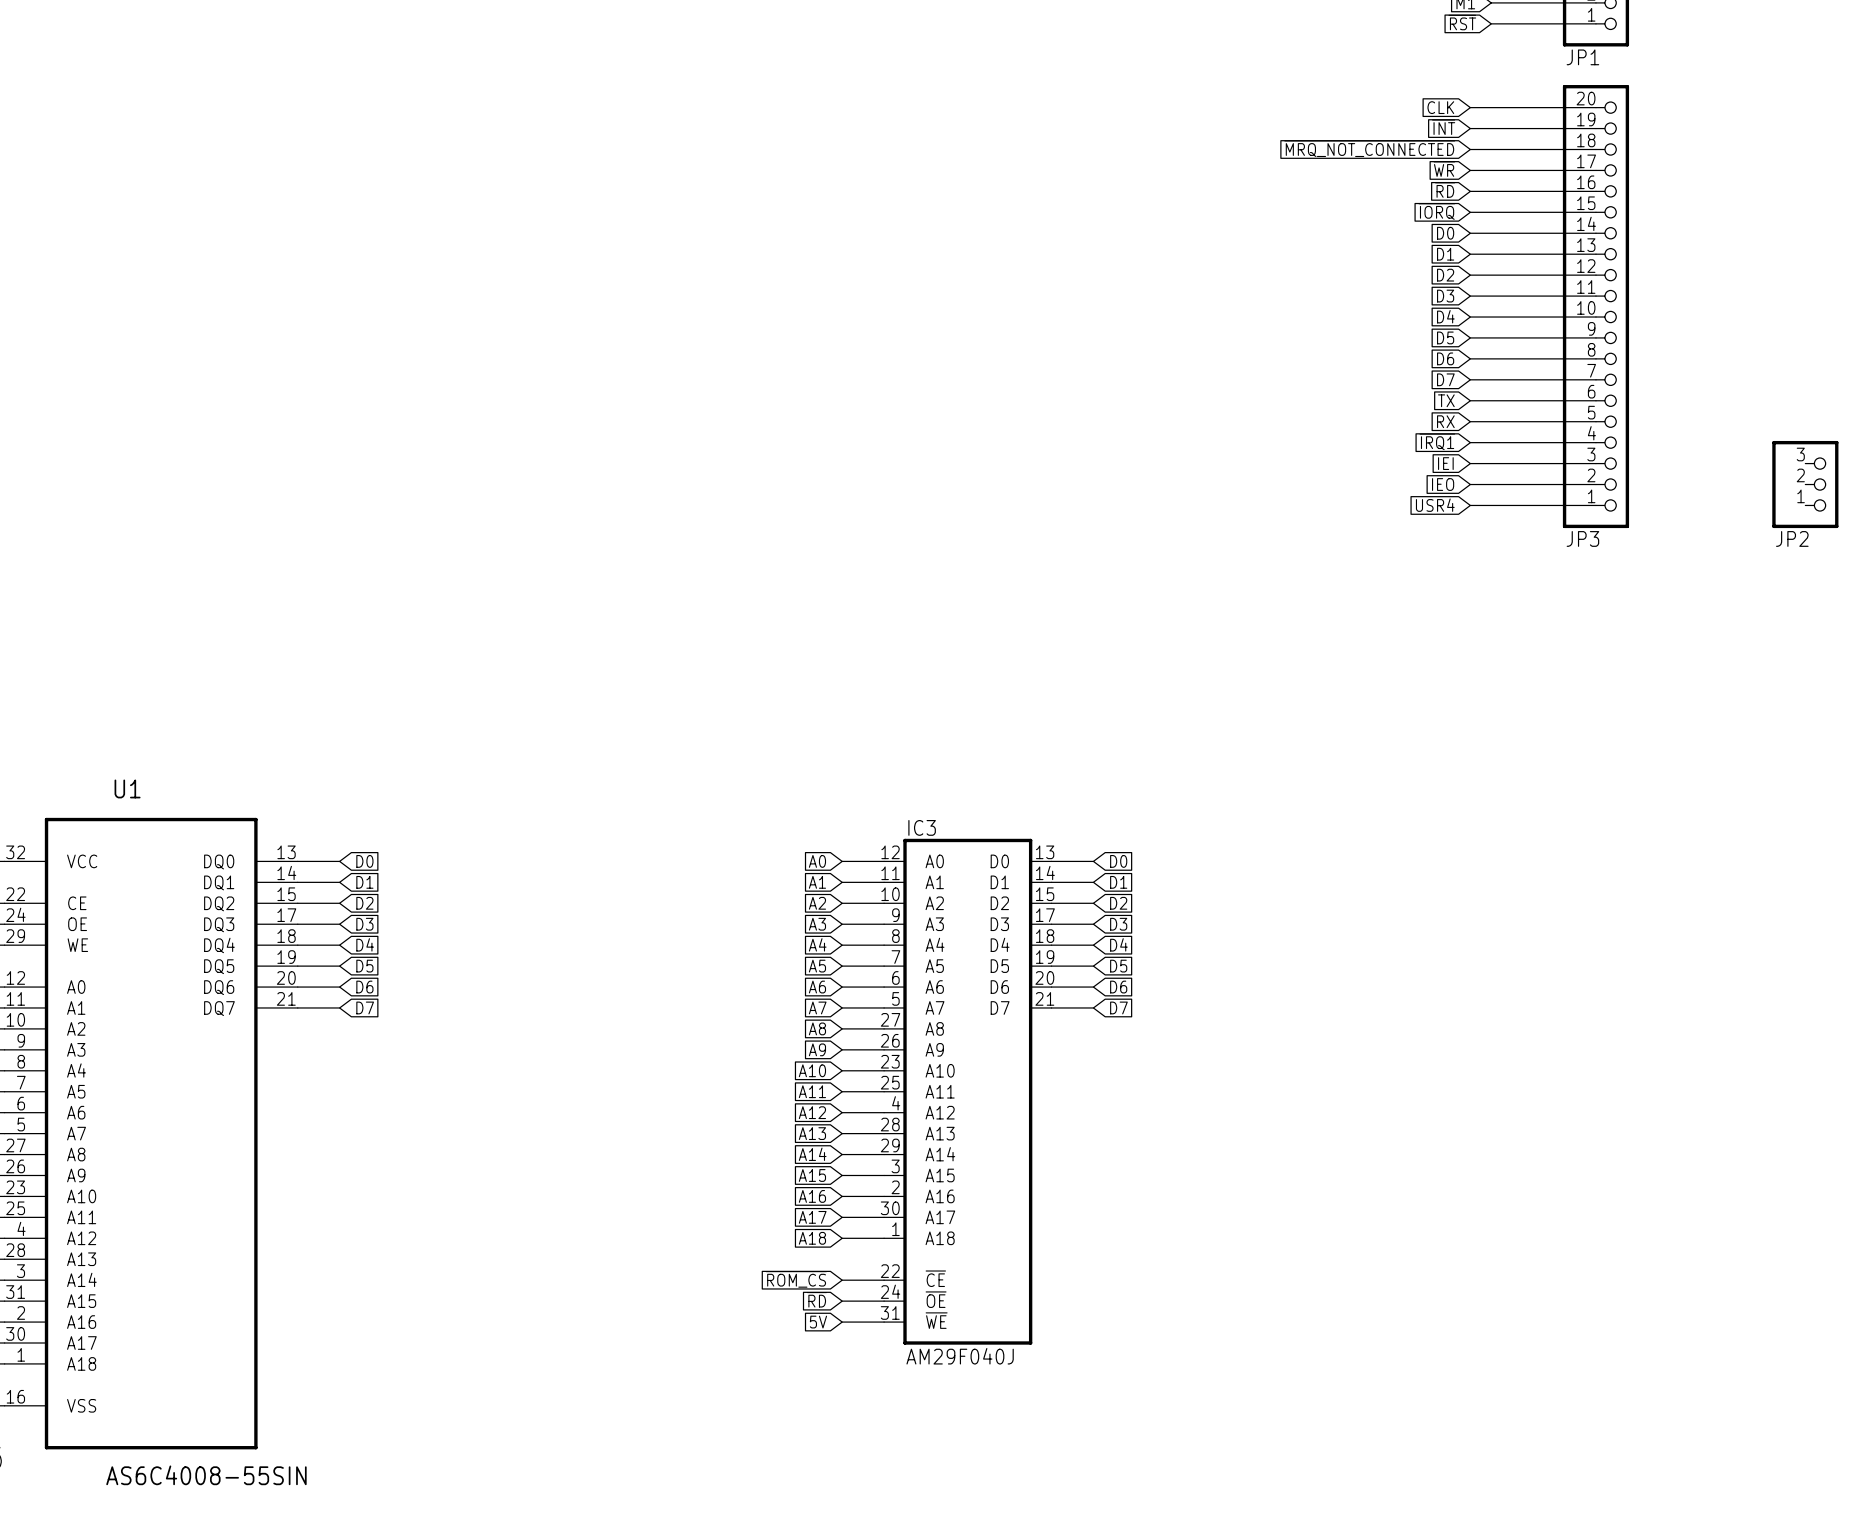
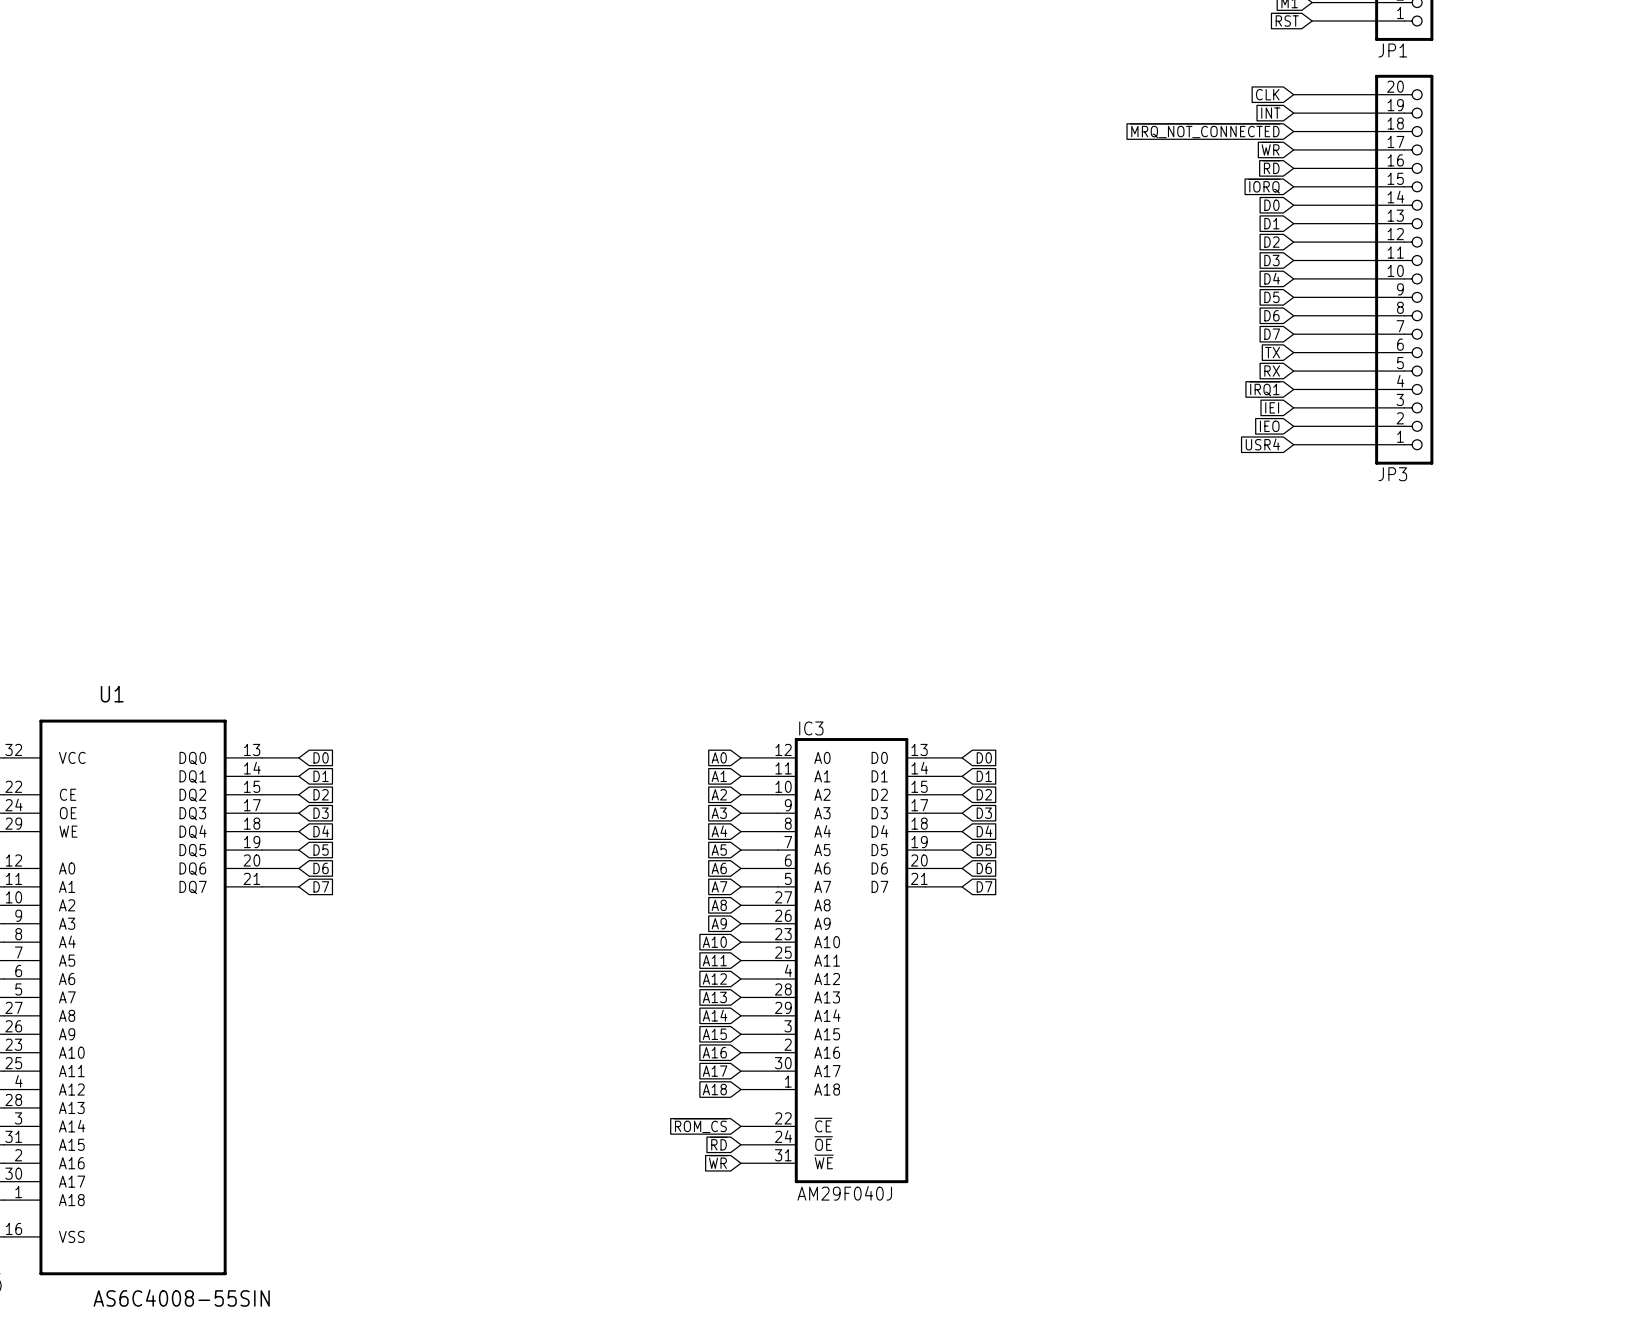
JP2: (1805, 484) -> none
global label: 5V (818, 1322) -> ~{WR} (718, 1162)

